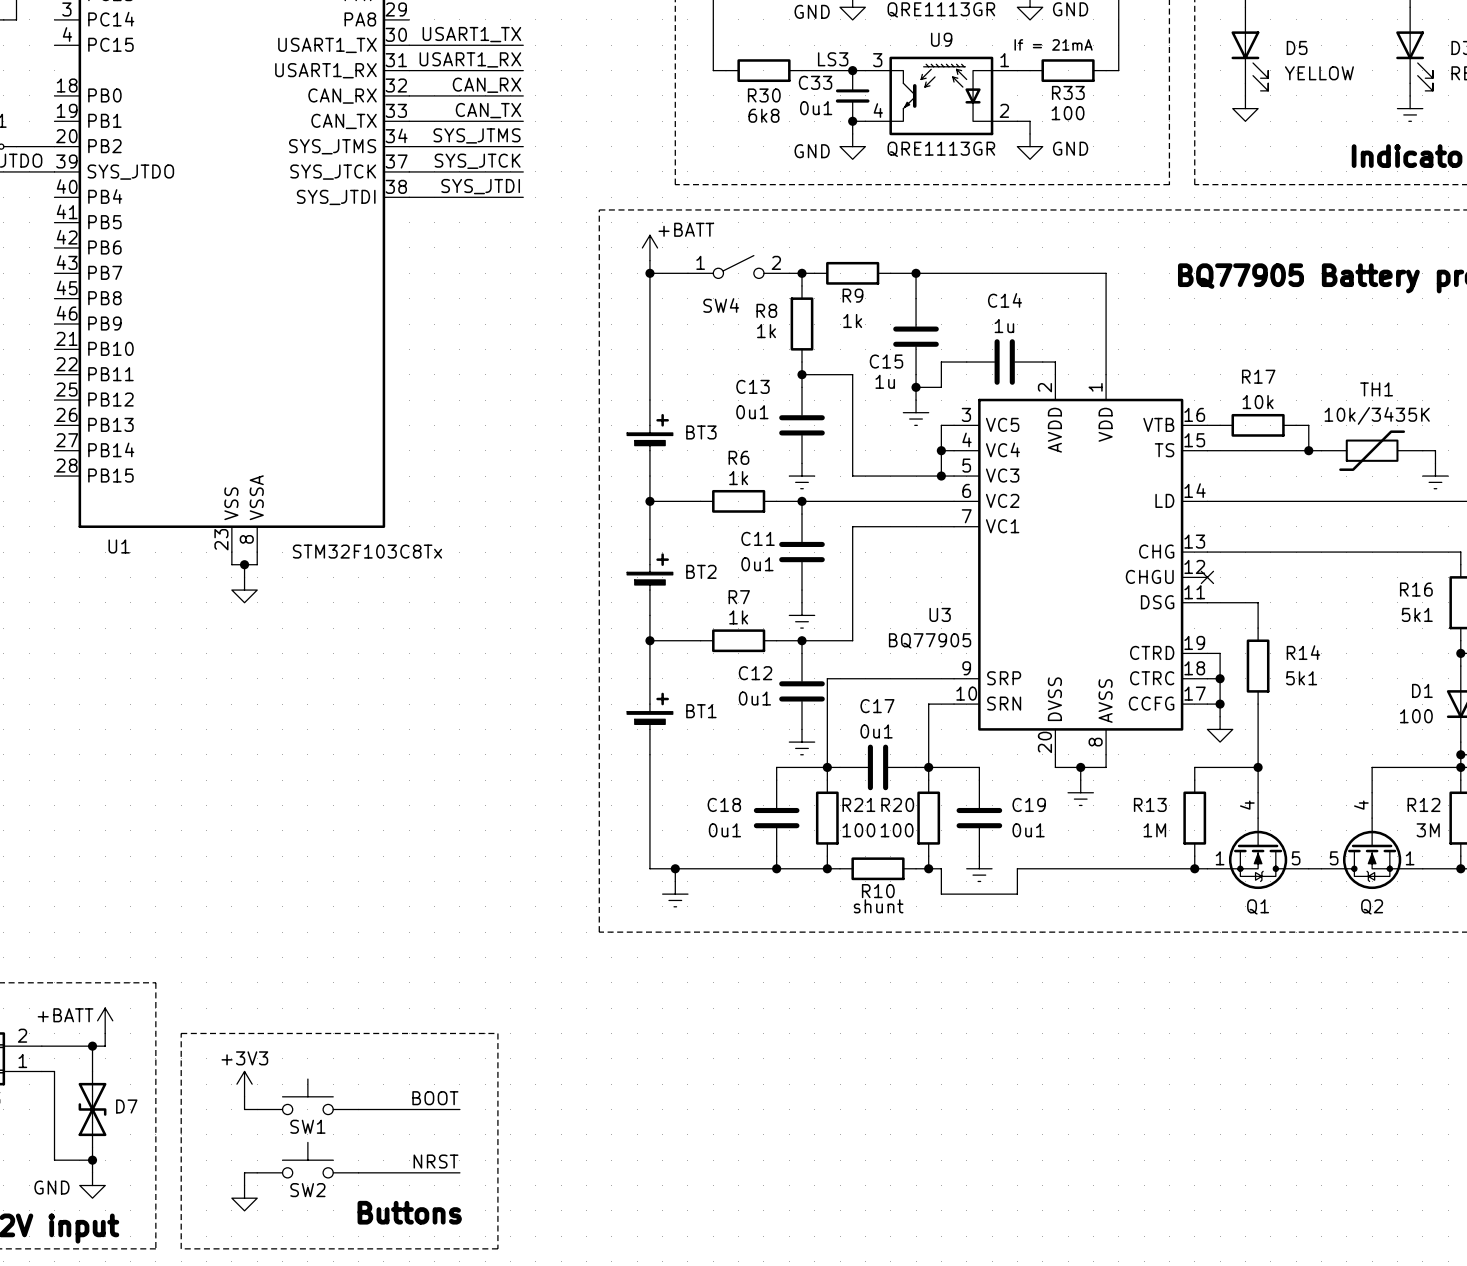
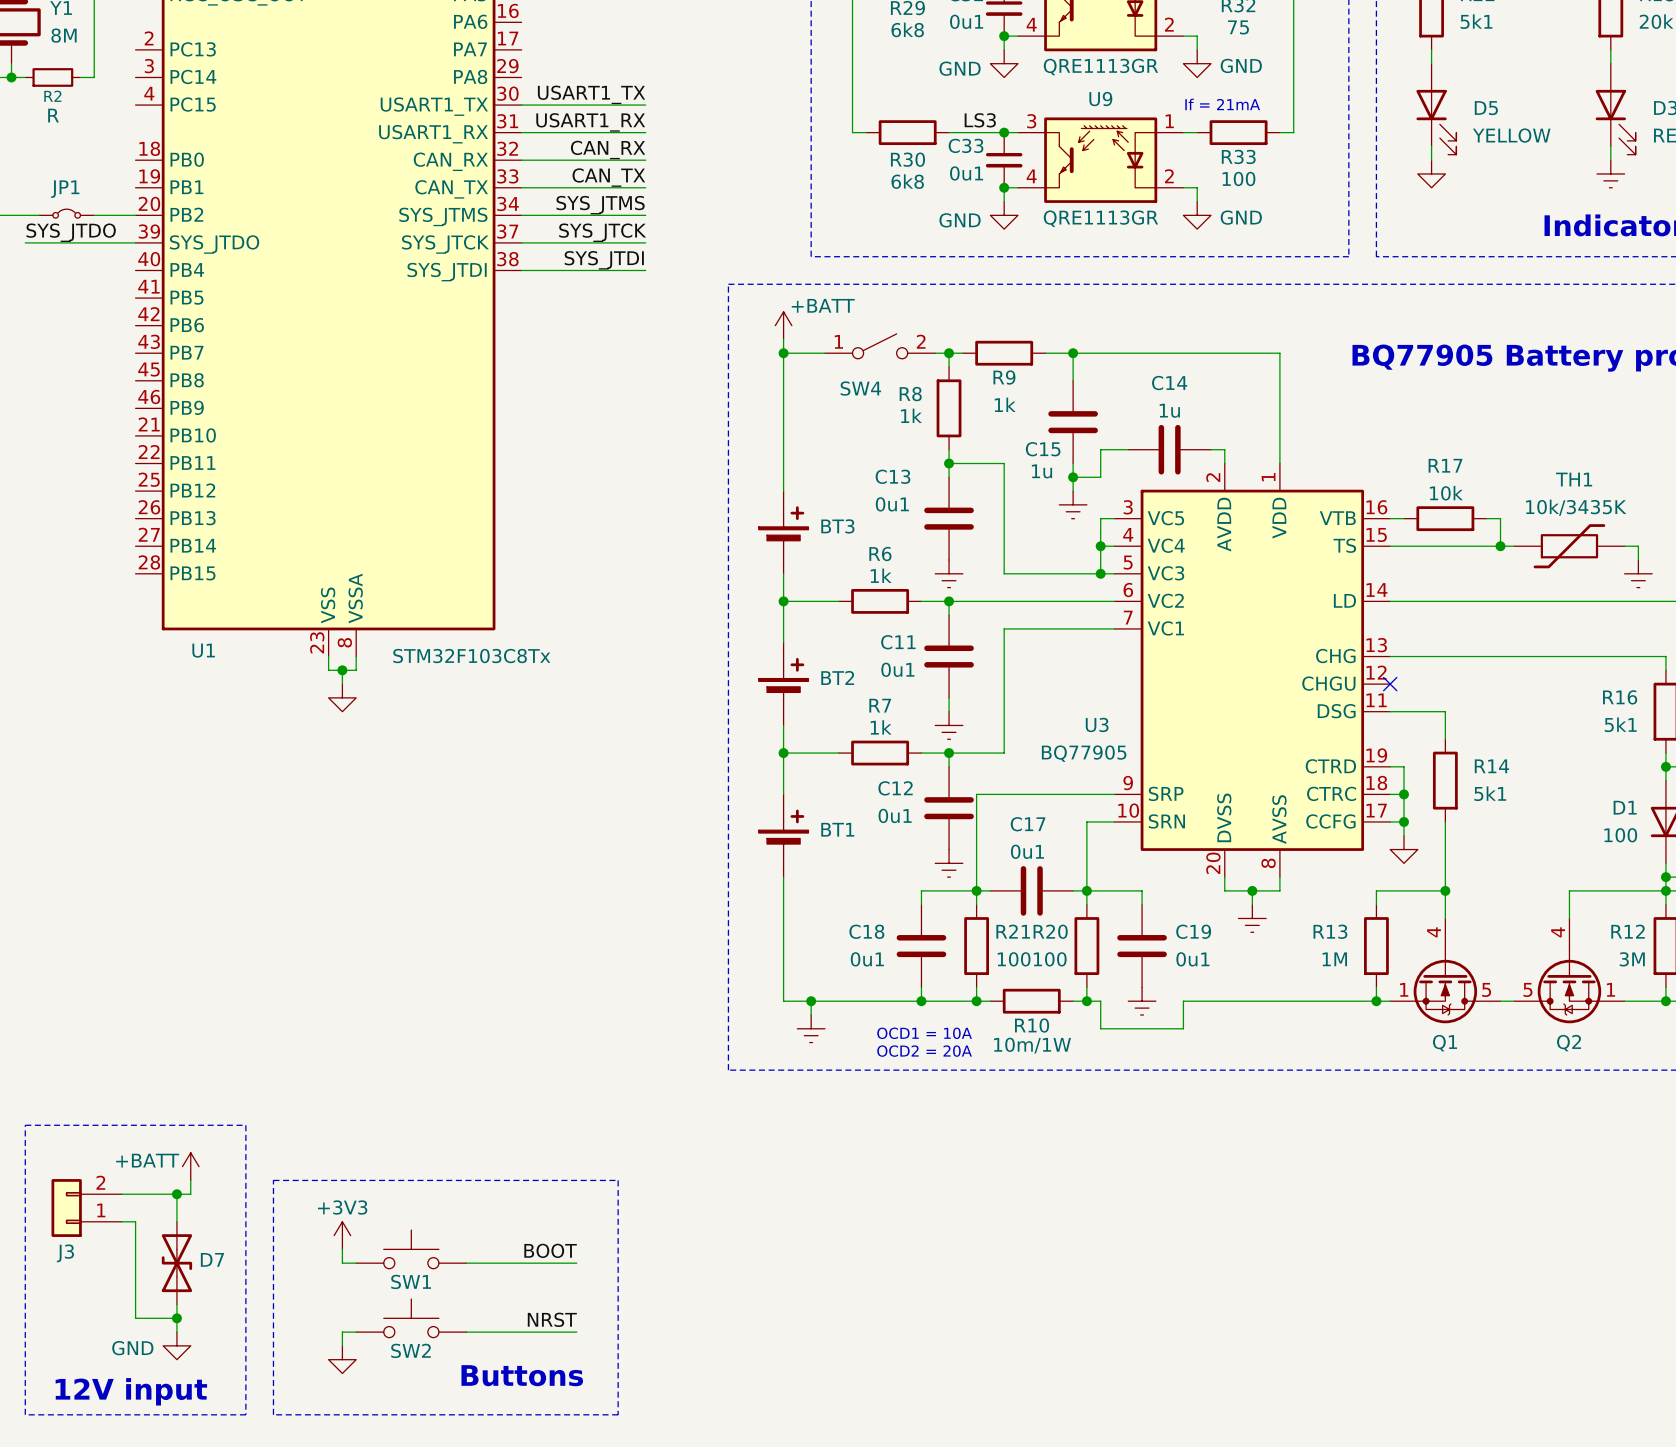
text: none -> OCD1 = 10A (924, 1033)
R10 value: shunt (878, 906) -> 10m/1W (1032, 1045)
text: none -> OCD2 = 20A (924, 1051)

